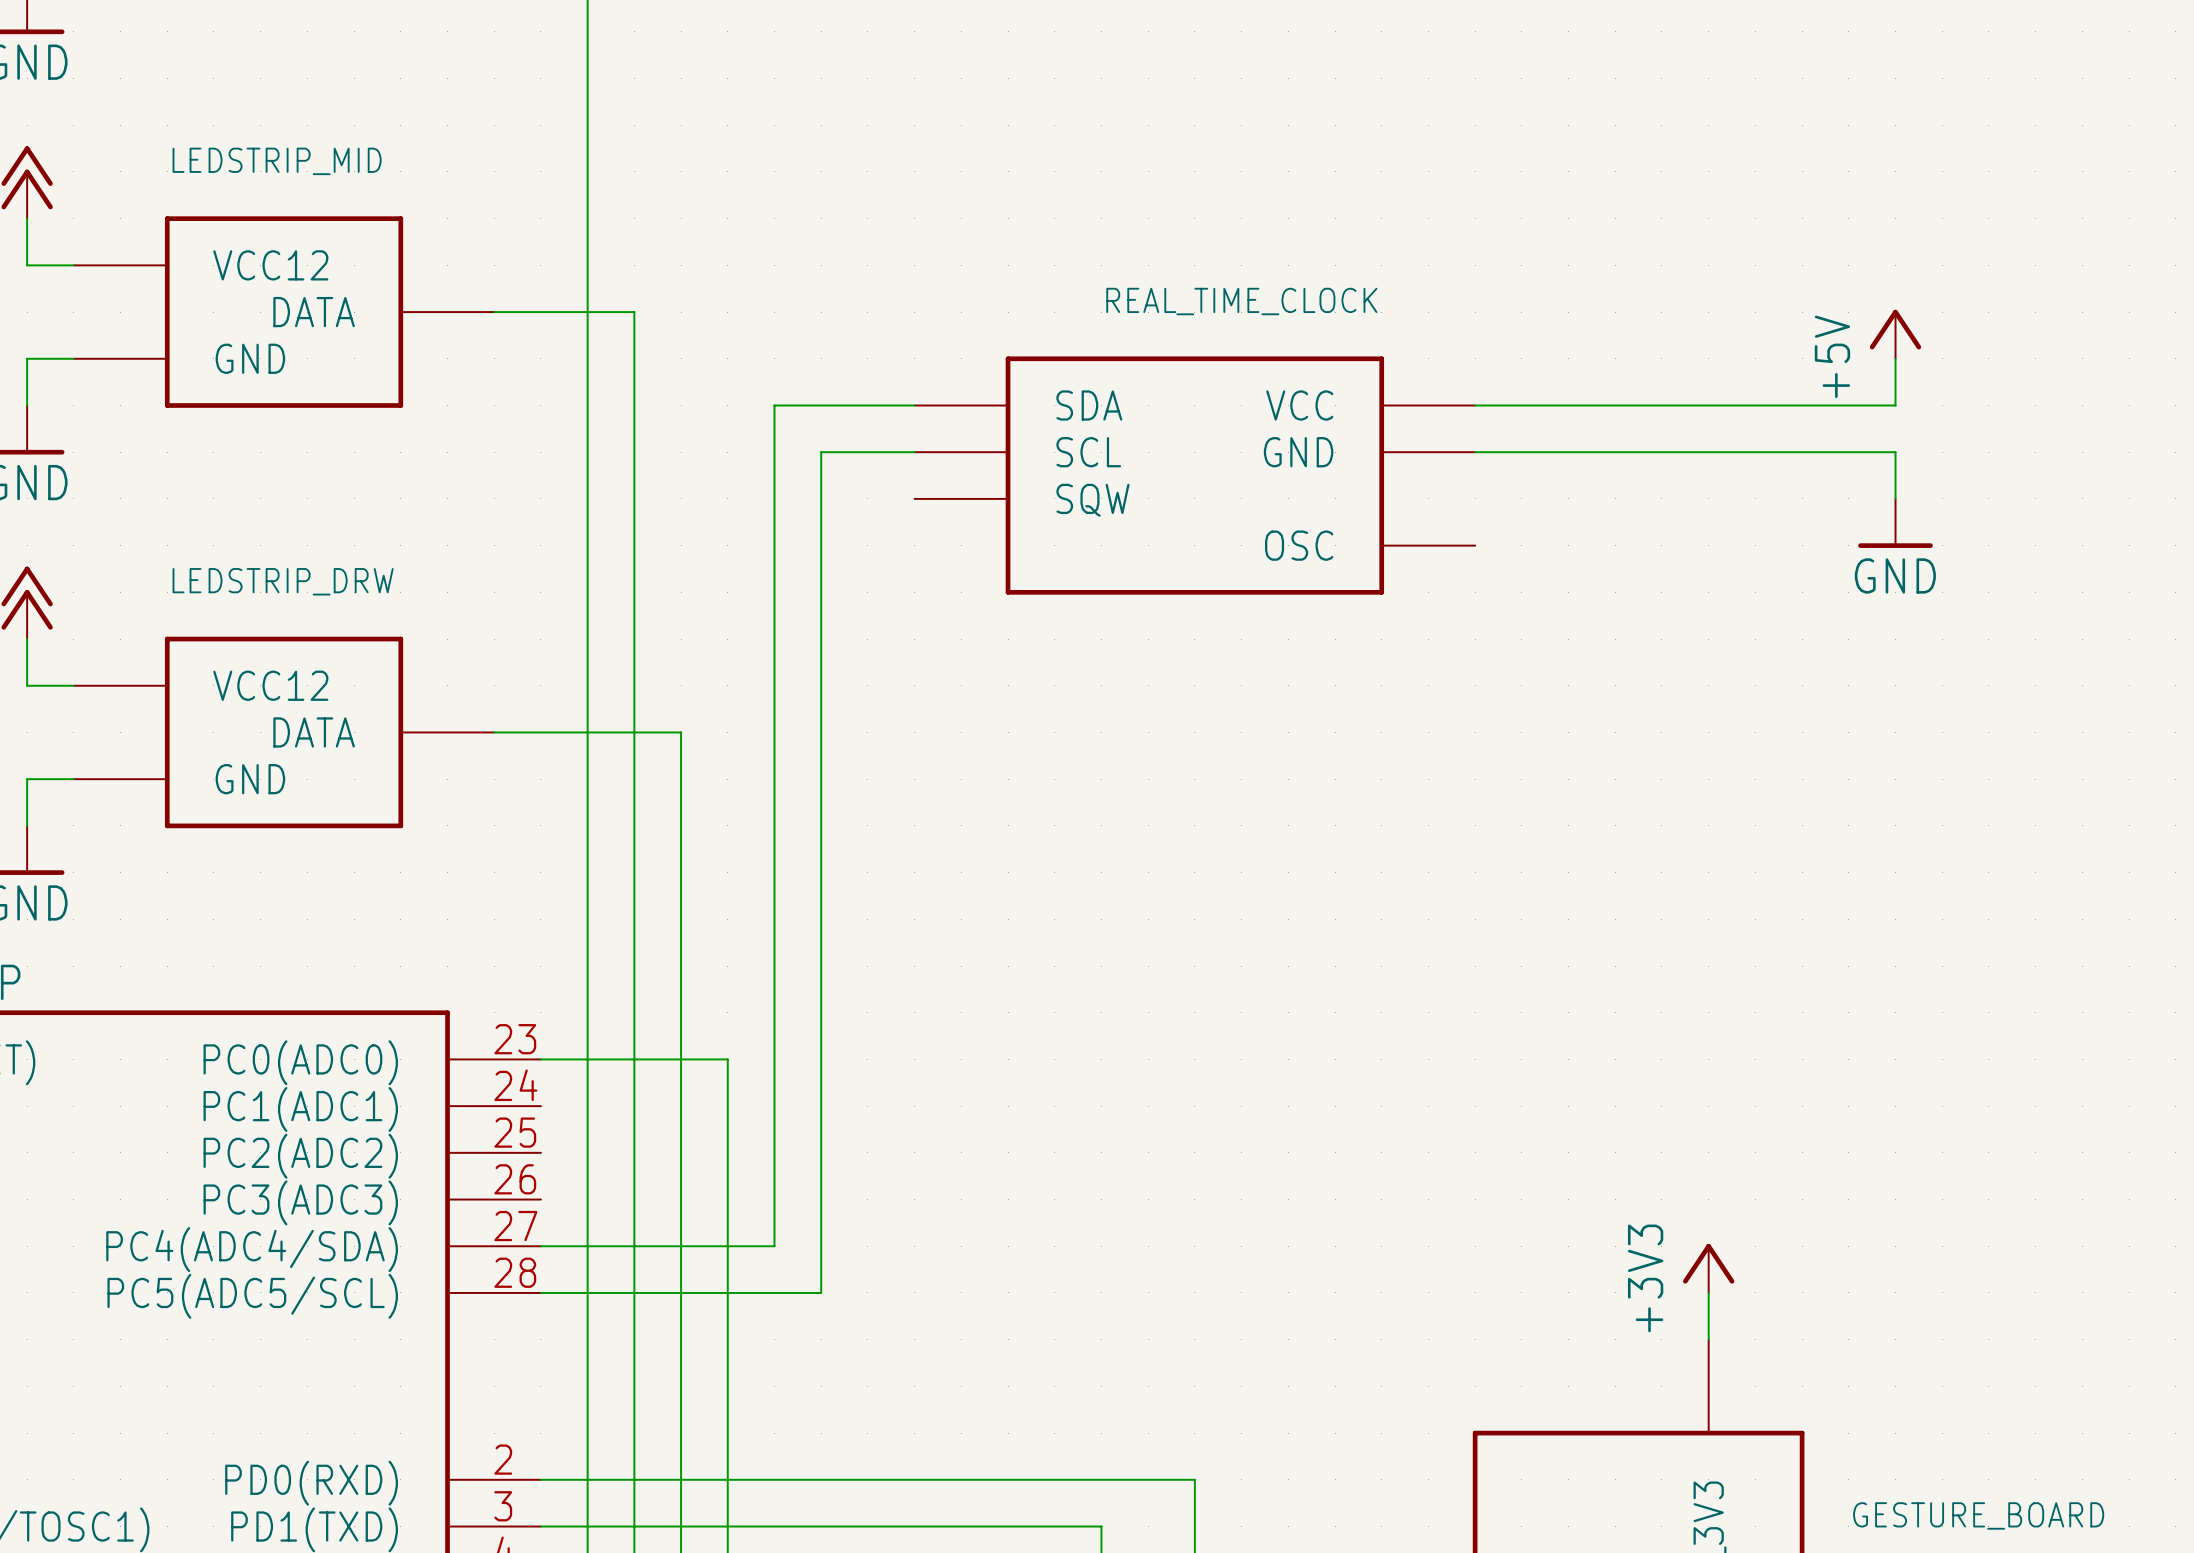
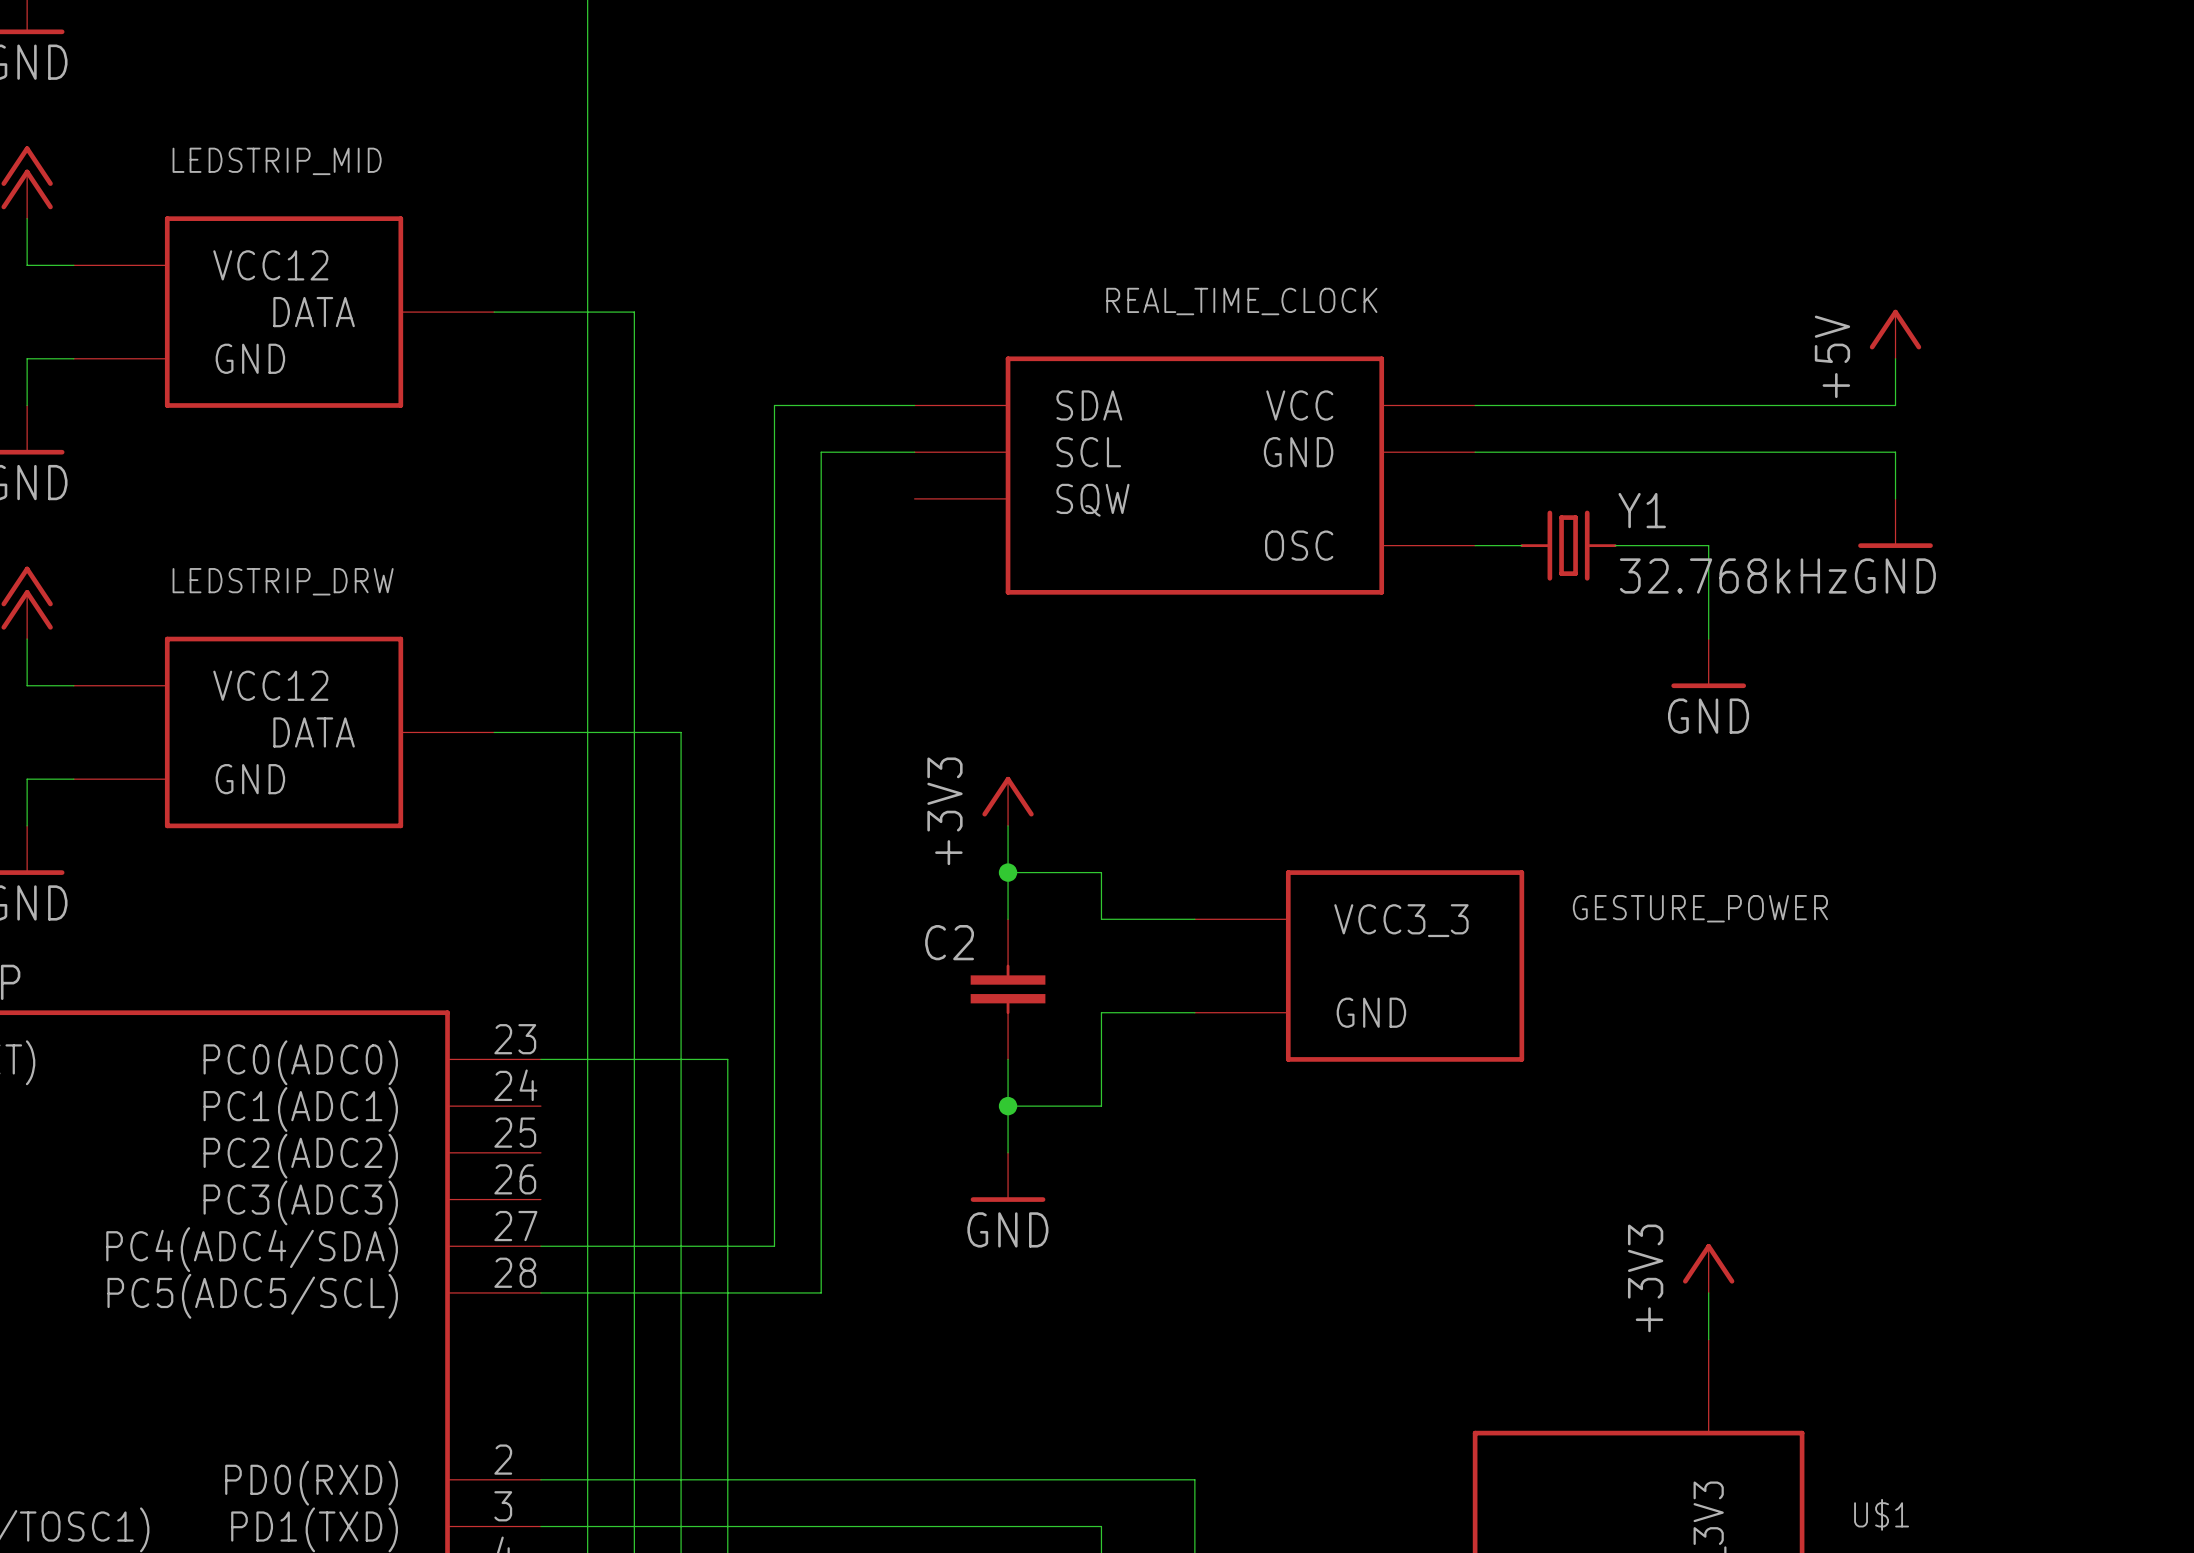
wire: none -> (1475, 545) (1521, 545)
Y1: none -> 32.768kHz (1568, 545)
wire: none -> (1615, 545) (1708, 545) (1708, 639)
power symbol: none -> GND (1708, 663)
power symbol: none -> +3V3 (1008, 801)
wire: none -> (1008, 825) (1008, 919)
wire: none -> (1008, 872) (1101, 872) (1101, 919) (1194, 919)
junction: none -> (1008, 872)
GESTURE_POWER: none -> (1359, 966)
C2: none -> (1008, 989)
wire: none -> (1194, 1012) (1101, 1012) (1101, 1106) (1008, 1106)
wire: none -> (1008, 1059) (1008, 1152)
junction: none -> (1008, 1106)
power symbol: none -> GND (1008, 1177)
GESTURE_BOARD name: GESTURE_BOARD (1978, 1515) -> U$1 (1881, 1514)

